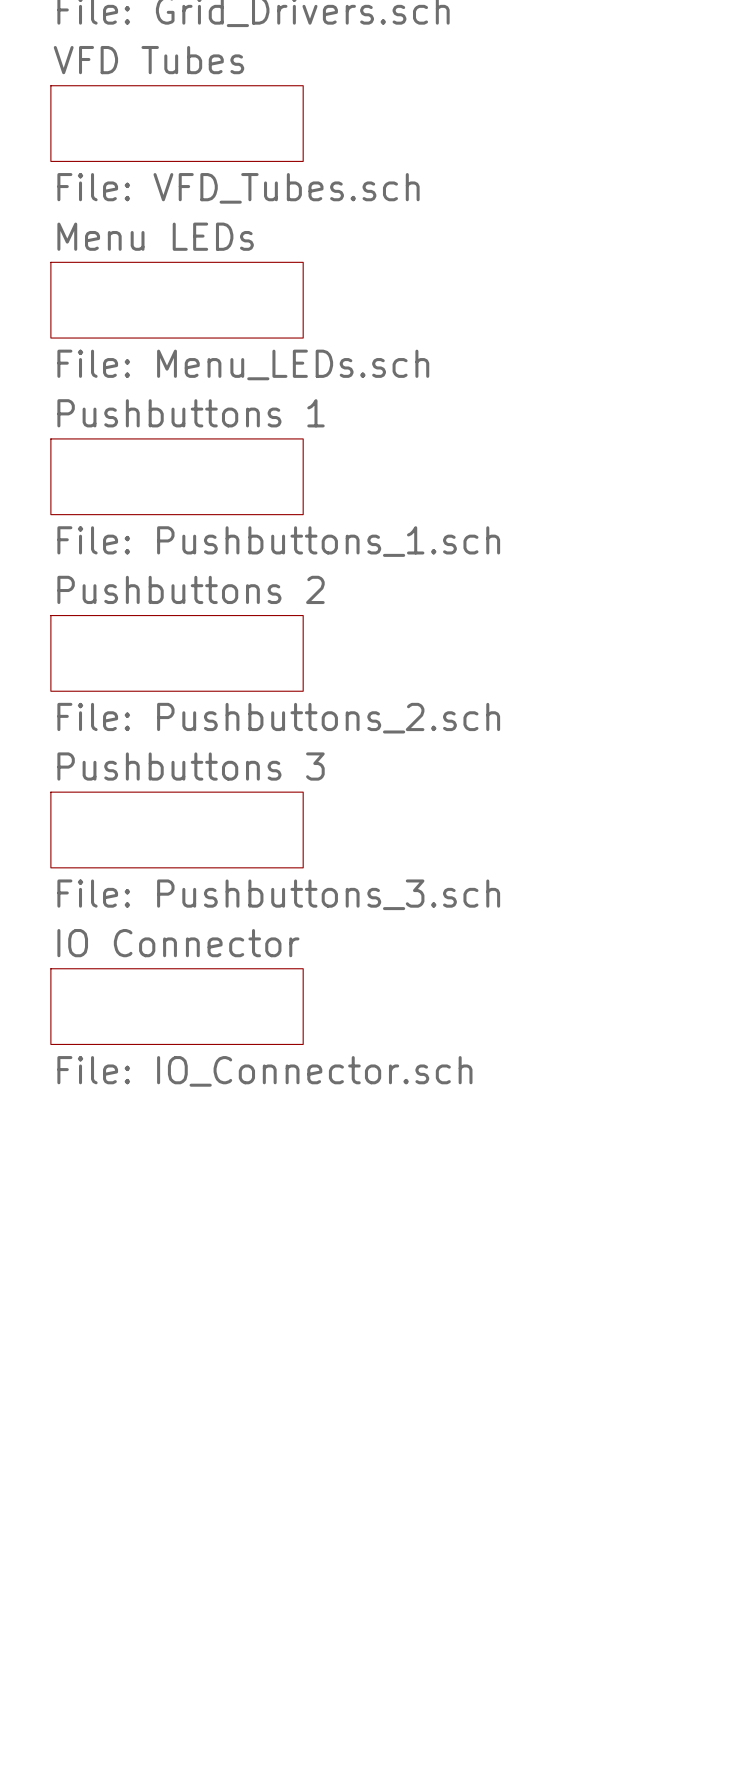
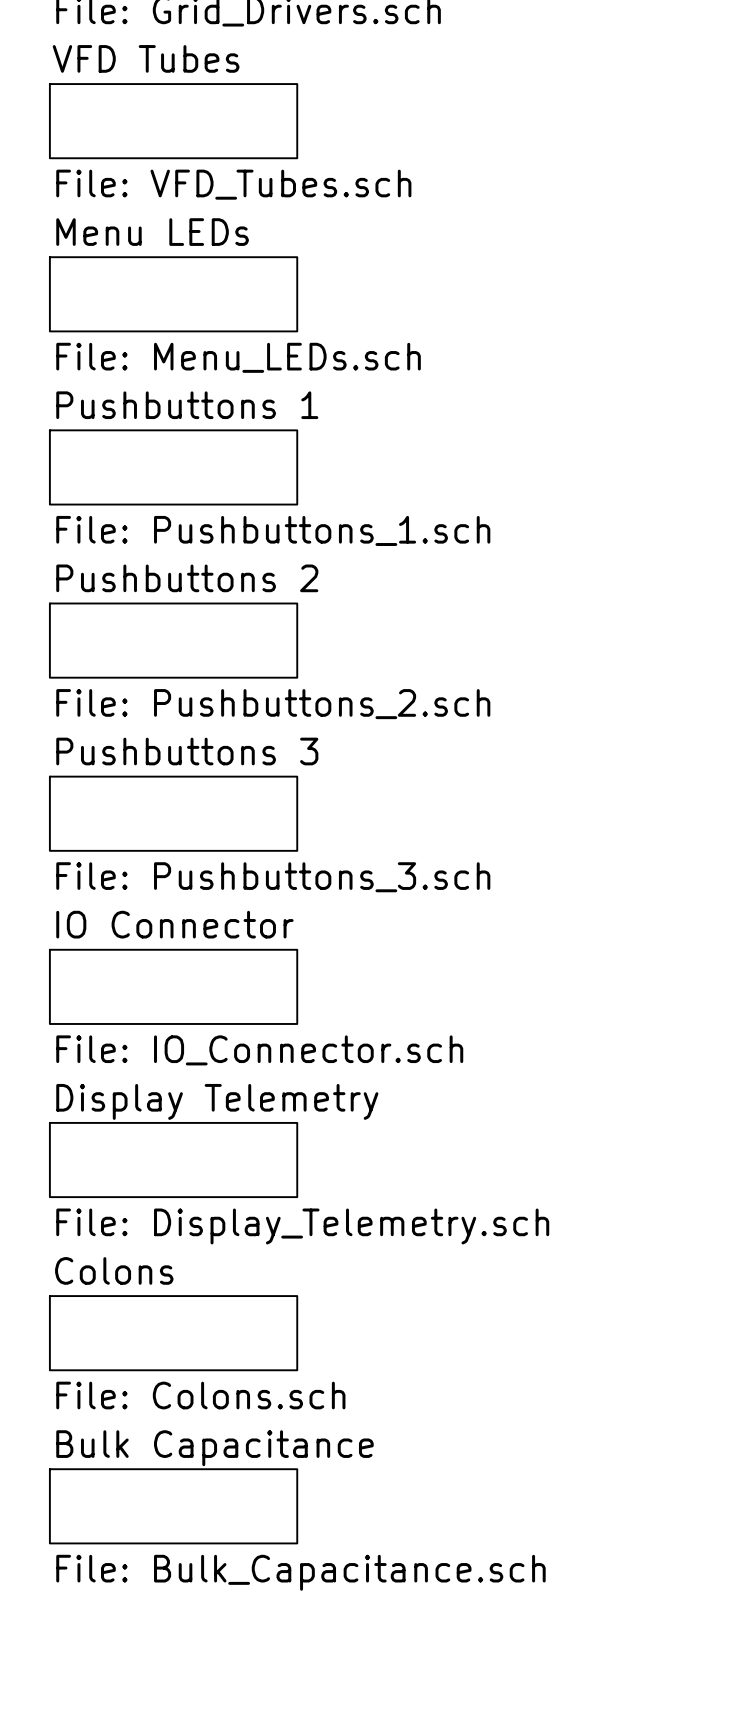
sheet Display Telemetry: none -> File: Display_Telemetry.sch (173, 1160)
sheet Colons: none -> File: Colons.sch (173, 1333)
sheet Bulk Capacitance: none -> File: Bulk_Capacitance.sch (173, 1506)

